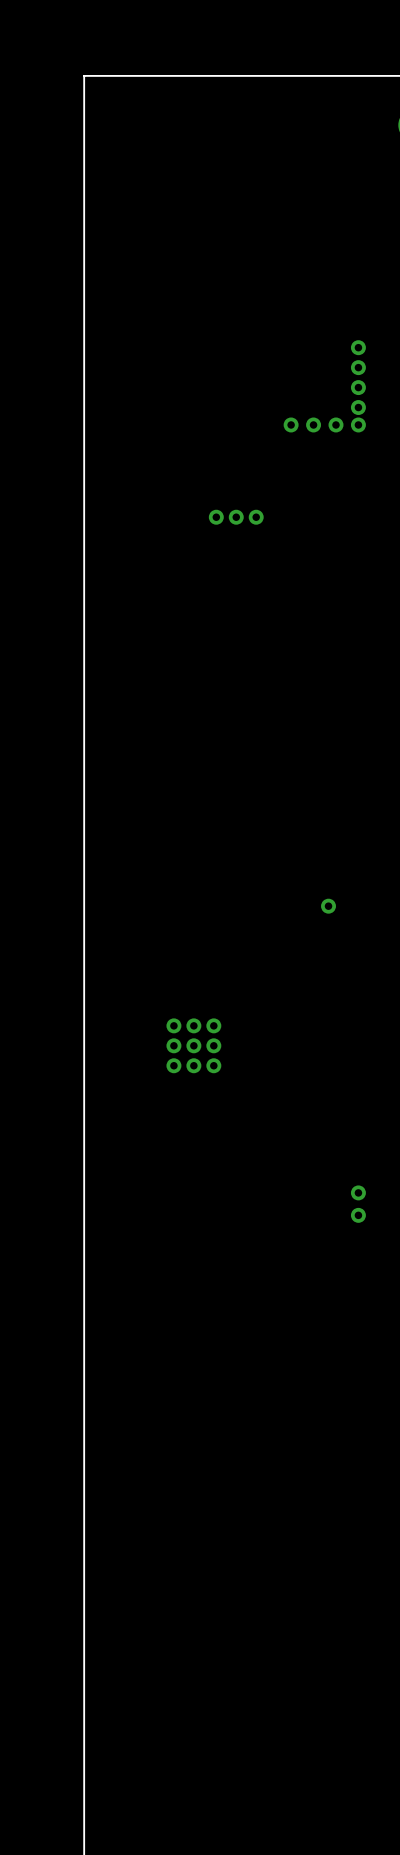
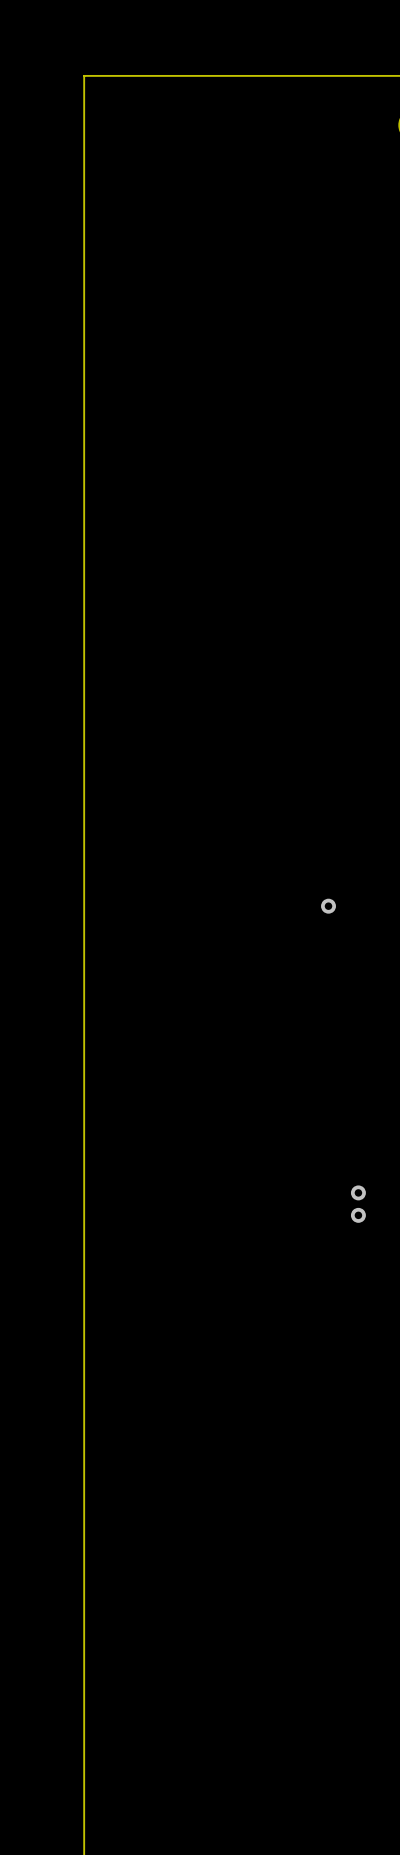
via: (358, 347) -> none
via: (358, 367) -> none
via: (358, 387) -> none
via: (358, 407) -> none
via: (291, 424) -> none
via: (313, 424) -> none
via: (335, 424) -> none
via: (358, 424) -> none
via: (216, 517) -> none
via: (236, 517) -> none
via: (256, 517) -> none
via: (173, 1025) -> none
via: (193, 1025) -> none
via: (213, 1025) -> none
via: (173, 1045) -> none
via: (193, 1045) -> none
via: (213, 1045) -> none
via: (173, 1065) -> none
via: (193, 1065) -> none
via: (213, 1065) -> none

